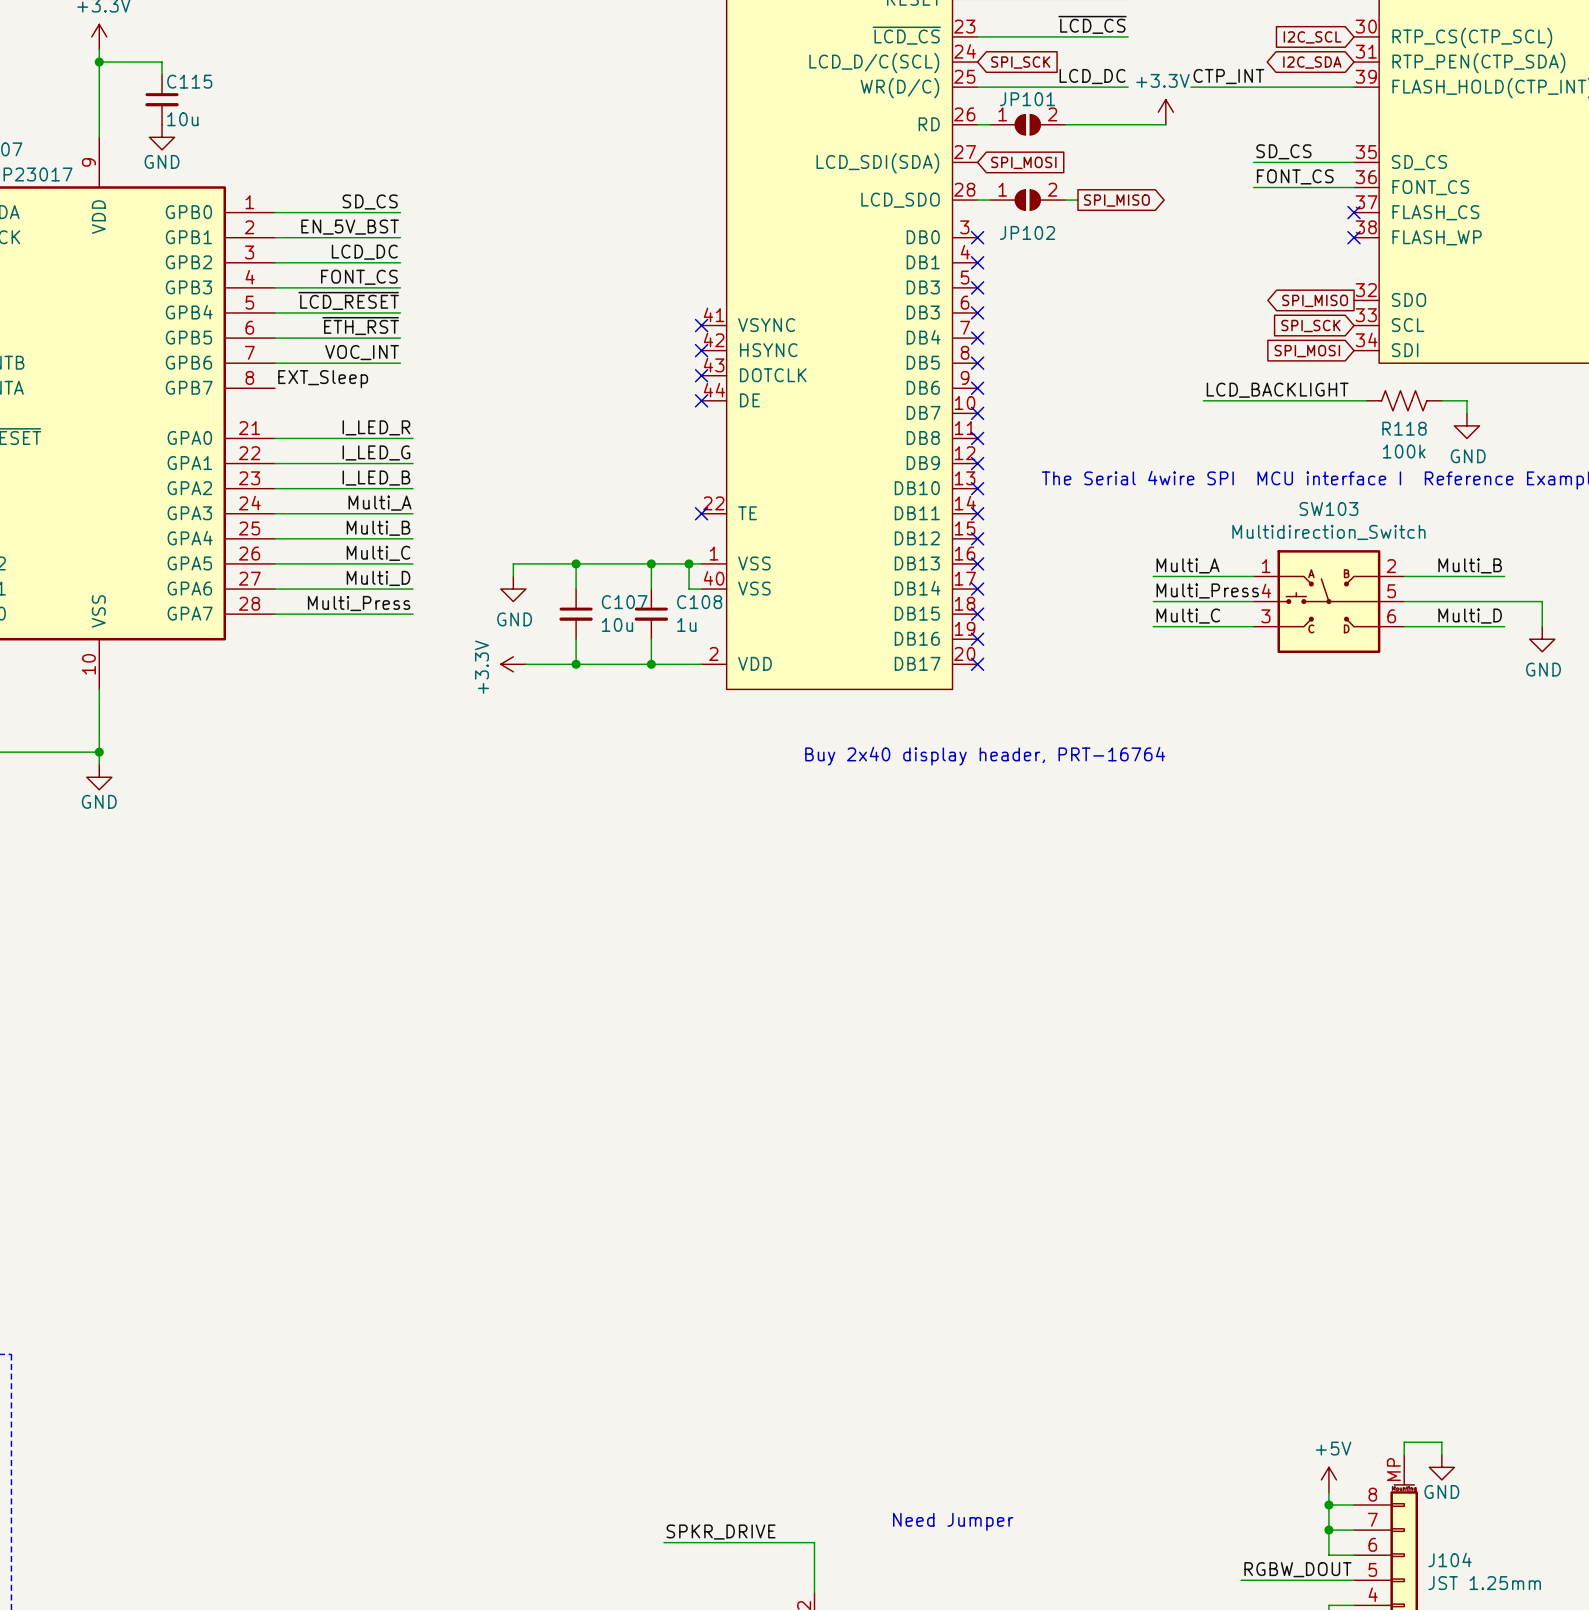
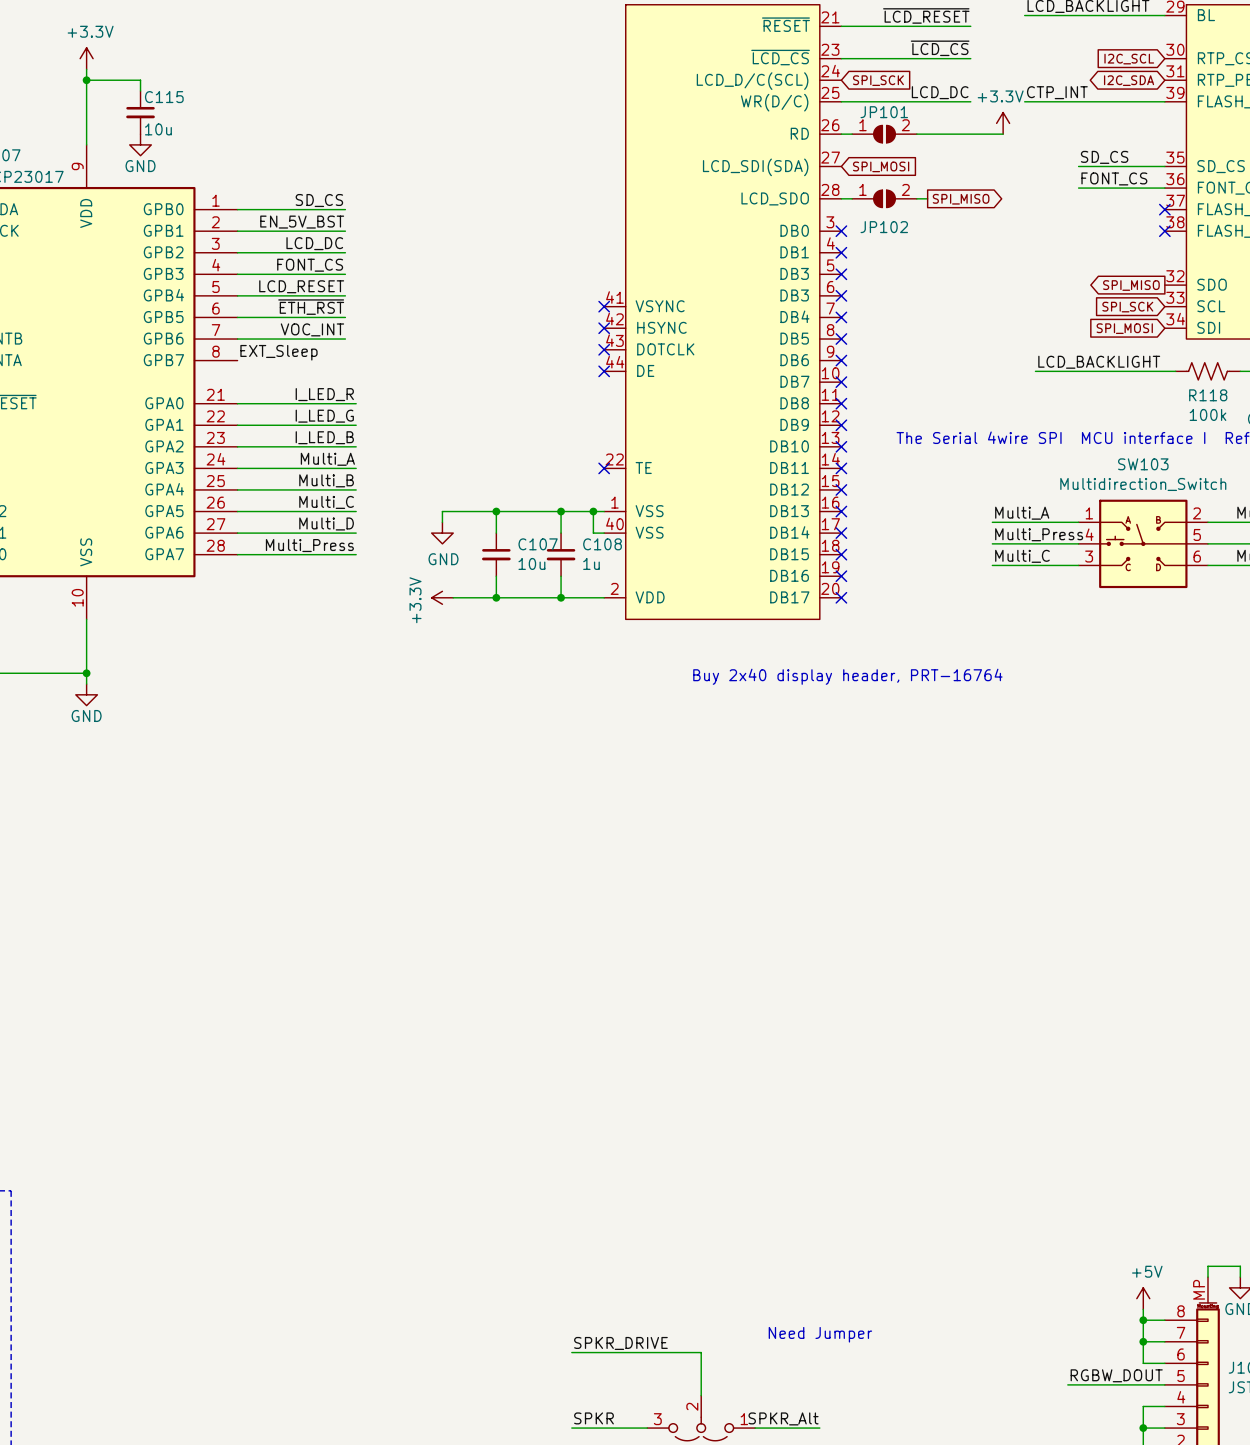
label: ~{LCD_RESET} (348, 300) -> LCD_RESET (301, 286)

